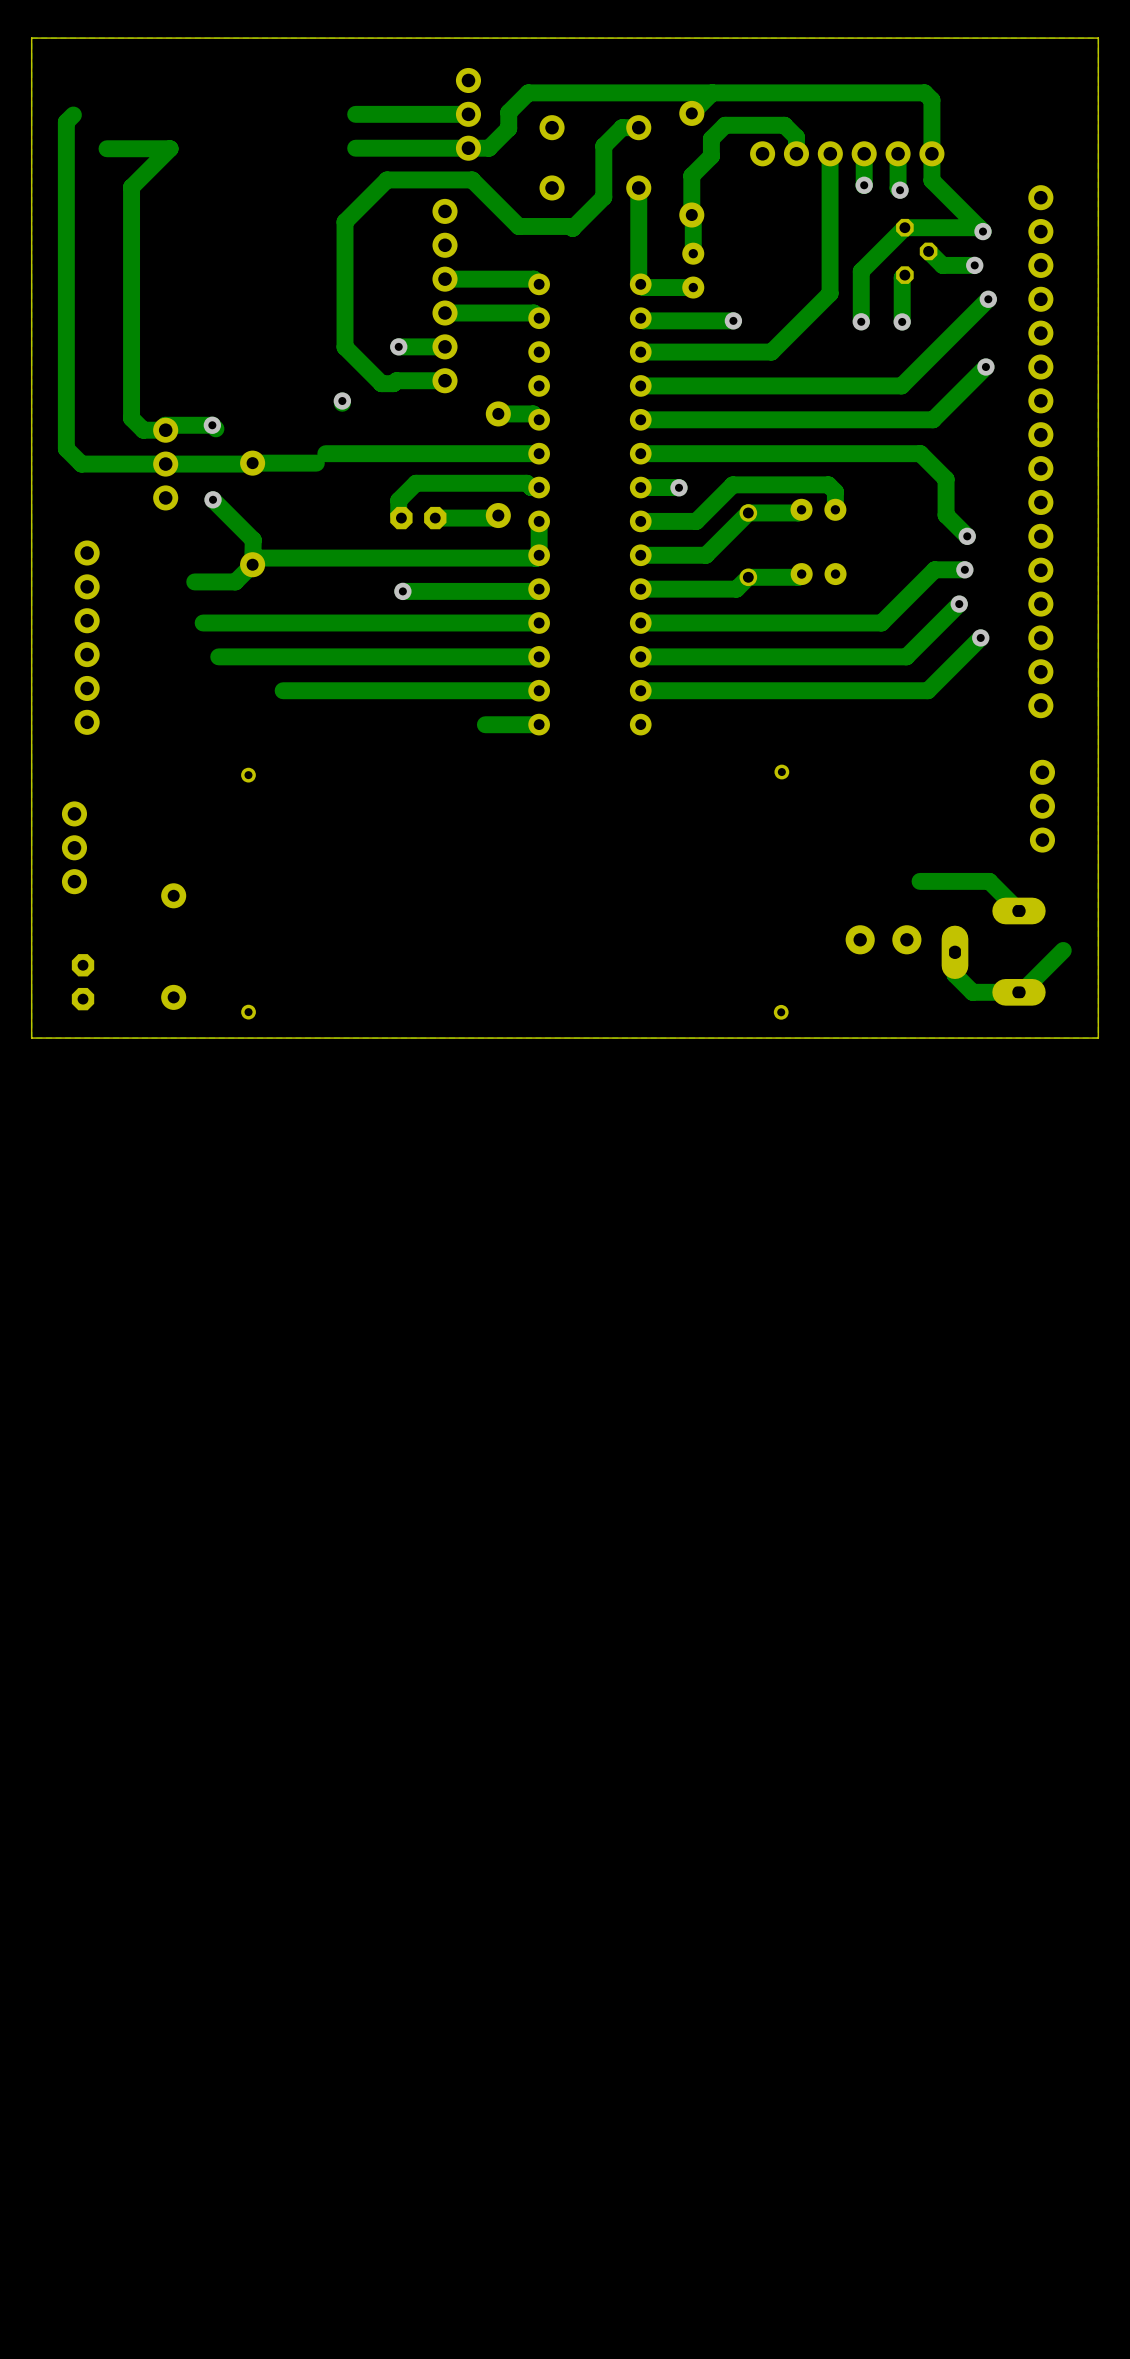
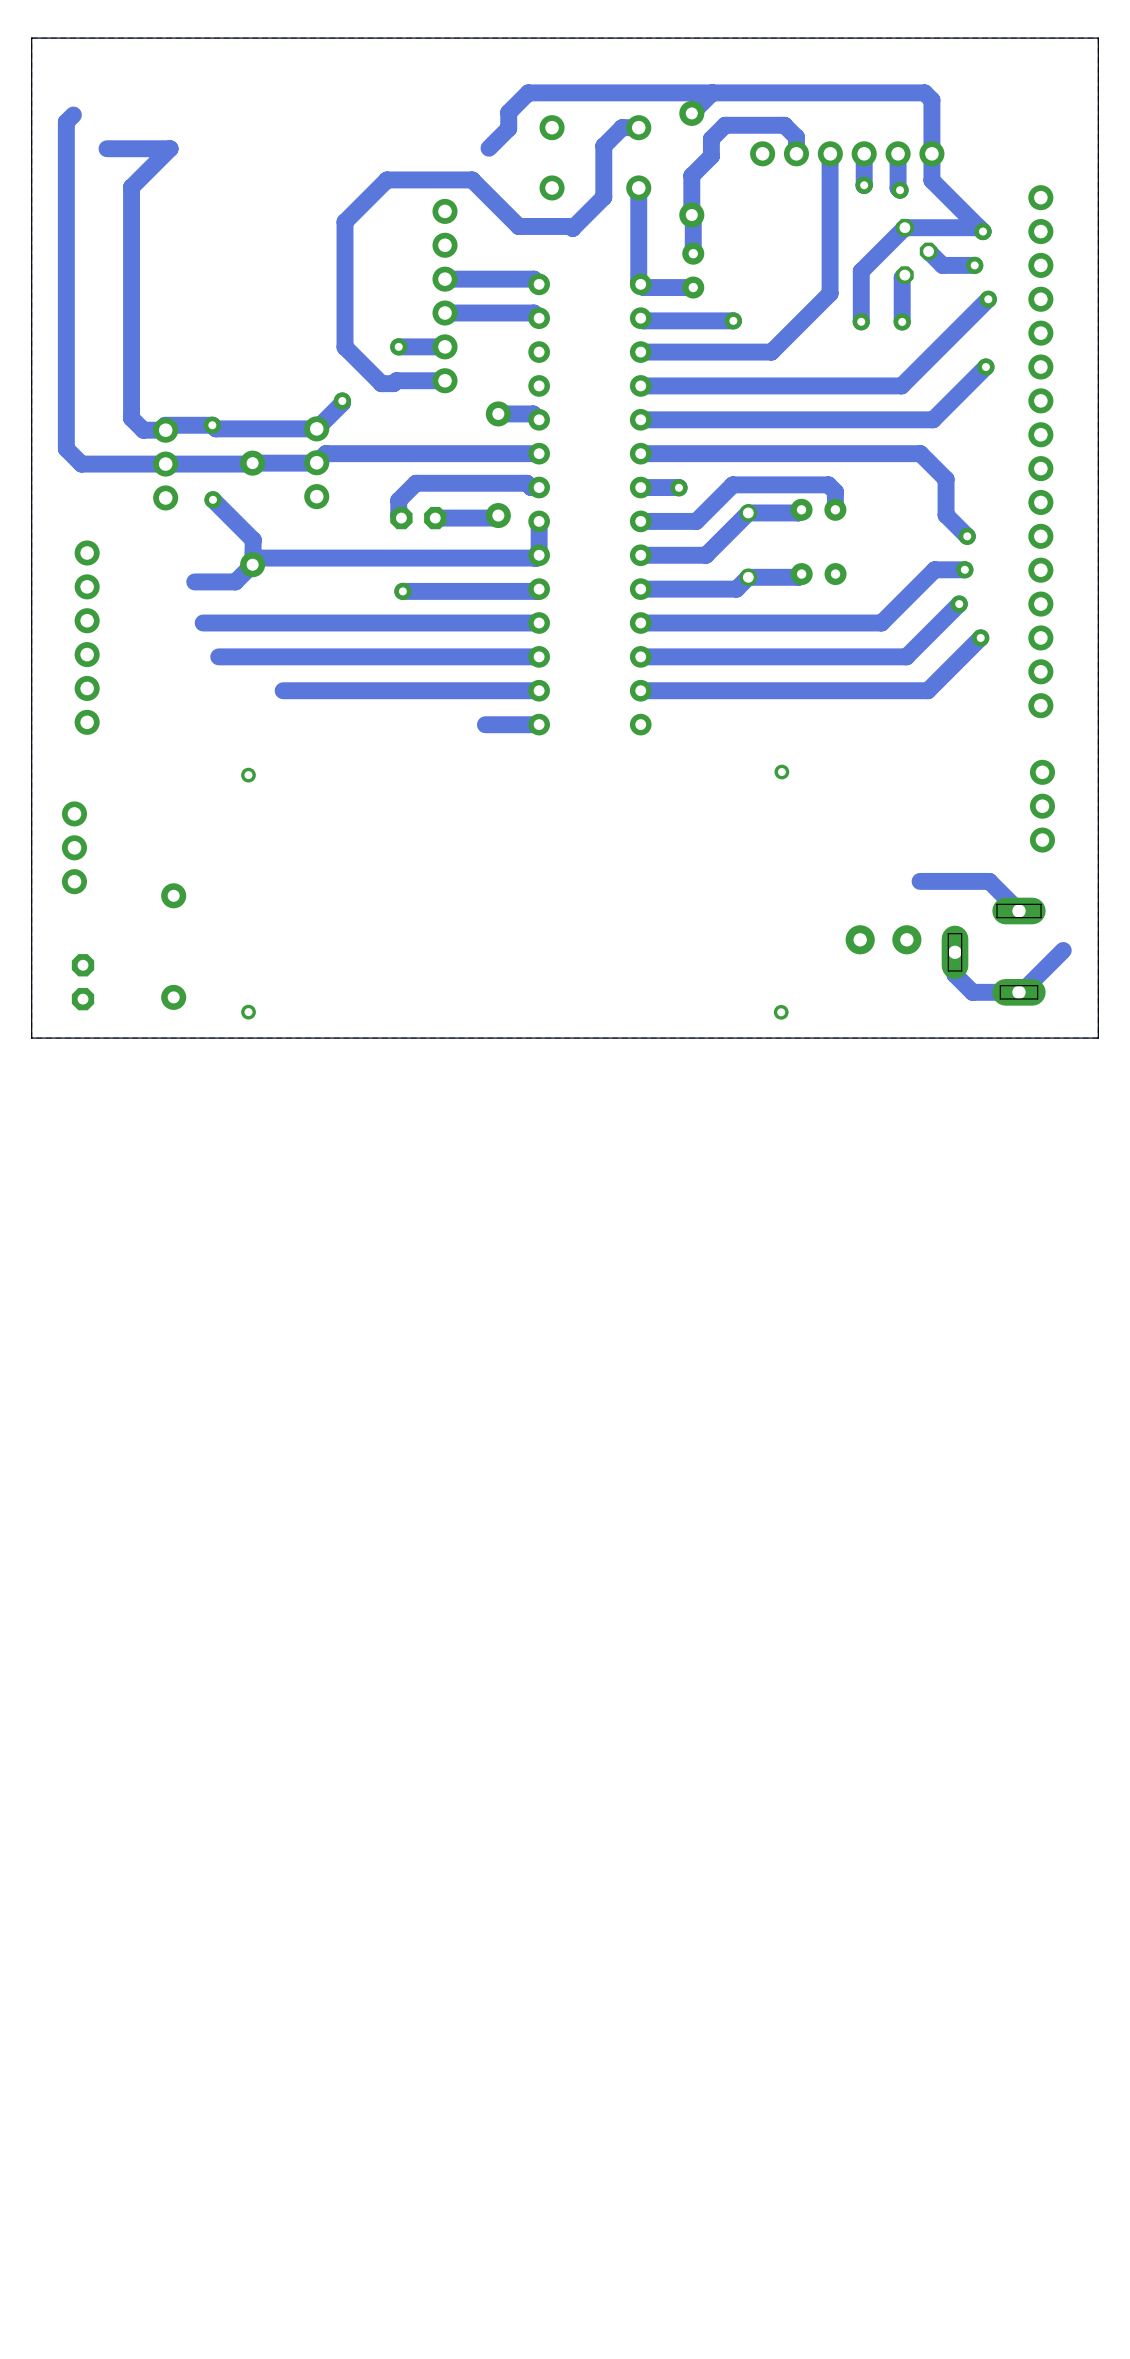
track: (468, 114) (355, 114) -> none
part: (468, 114) -> none
track: (489, 148) (355, 148) -> none
track: none -> (342, 403) (316, 428) (215, 428)
part: none -> (316, 462)

